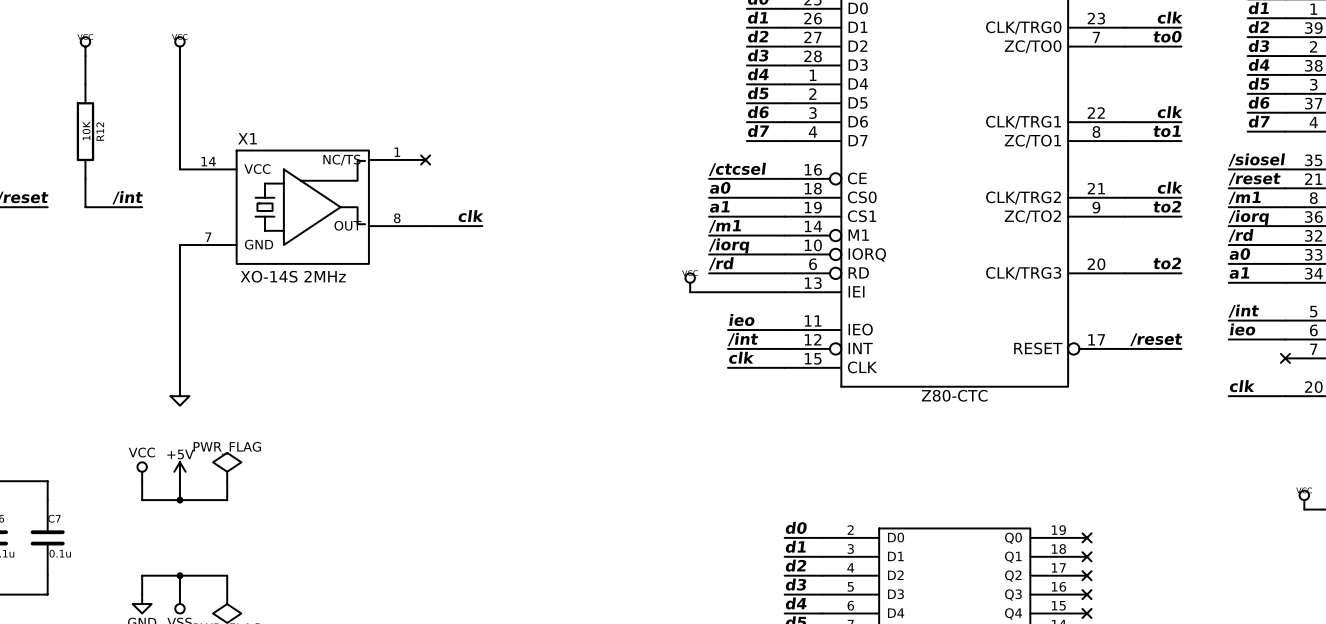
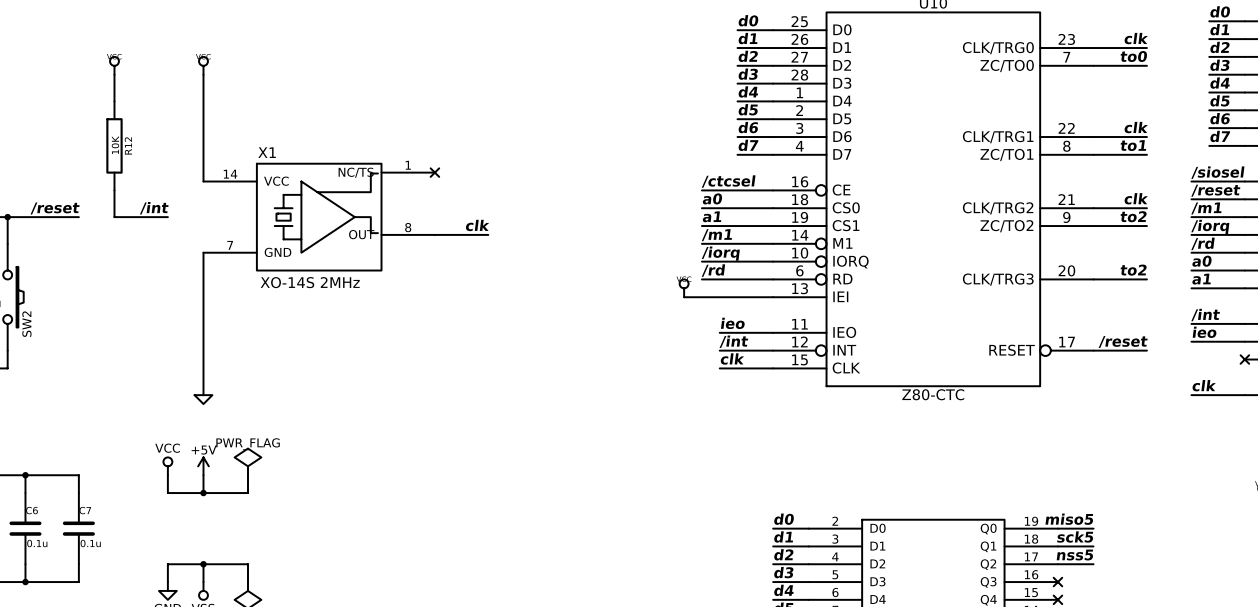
label: none -> miso5 (1069, 519)
wire: none -> (1057, 528) (1093, 528)
no-connect mark: (1087, 537) -> none
label: none -> sck5 (1075, 537)
wire: none -> (1057, 546) (1093, 546)
no-connect mark: (1087, 556) -> none
label: none -> nss5 (1074, 555)
wire: none -> (1057, 564) (1093, 564)
no-connect mark: (1087, 575) -> none

